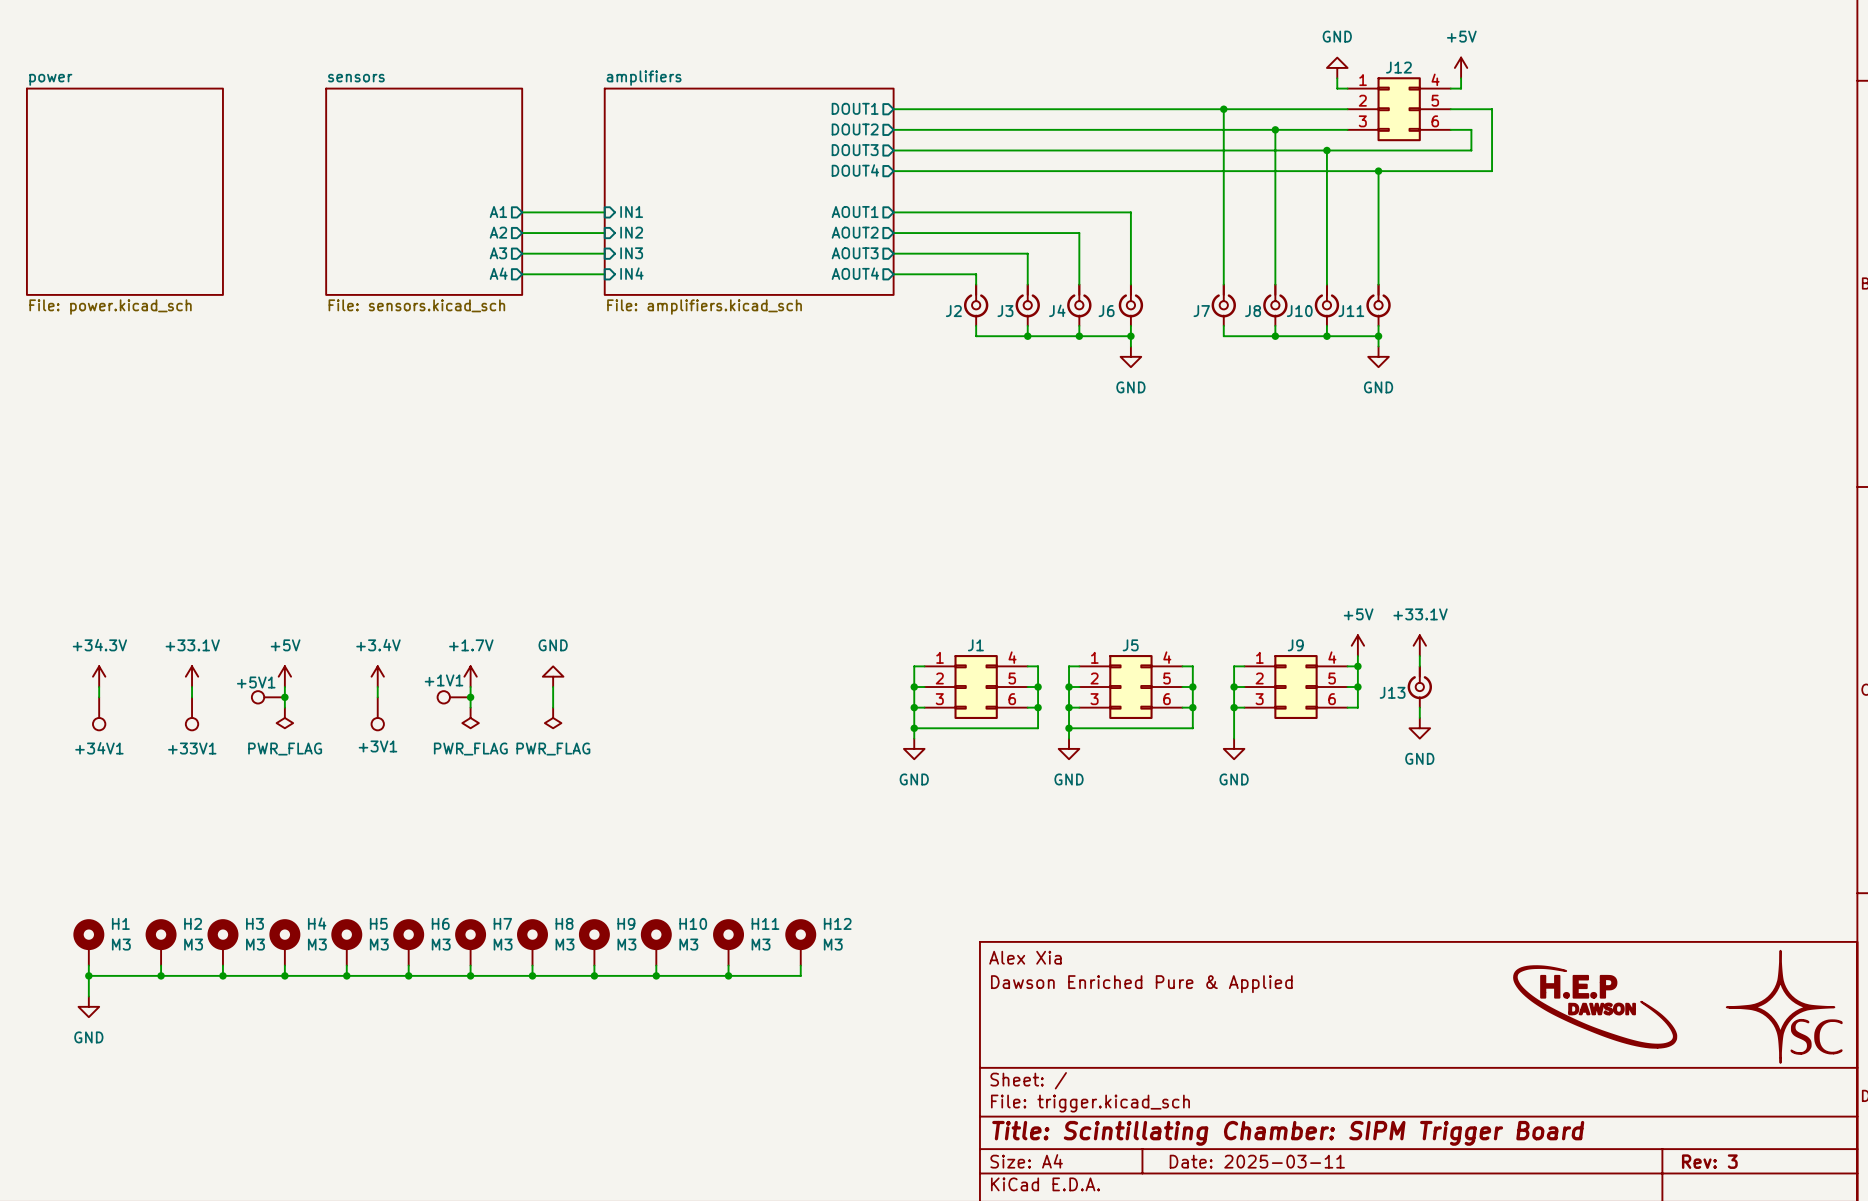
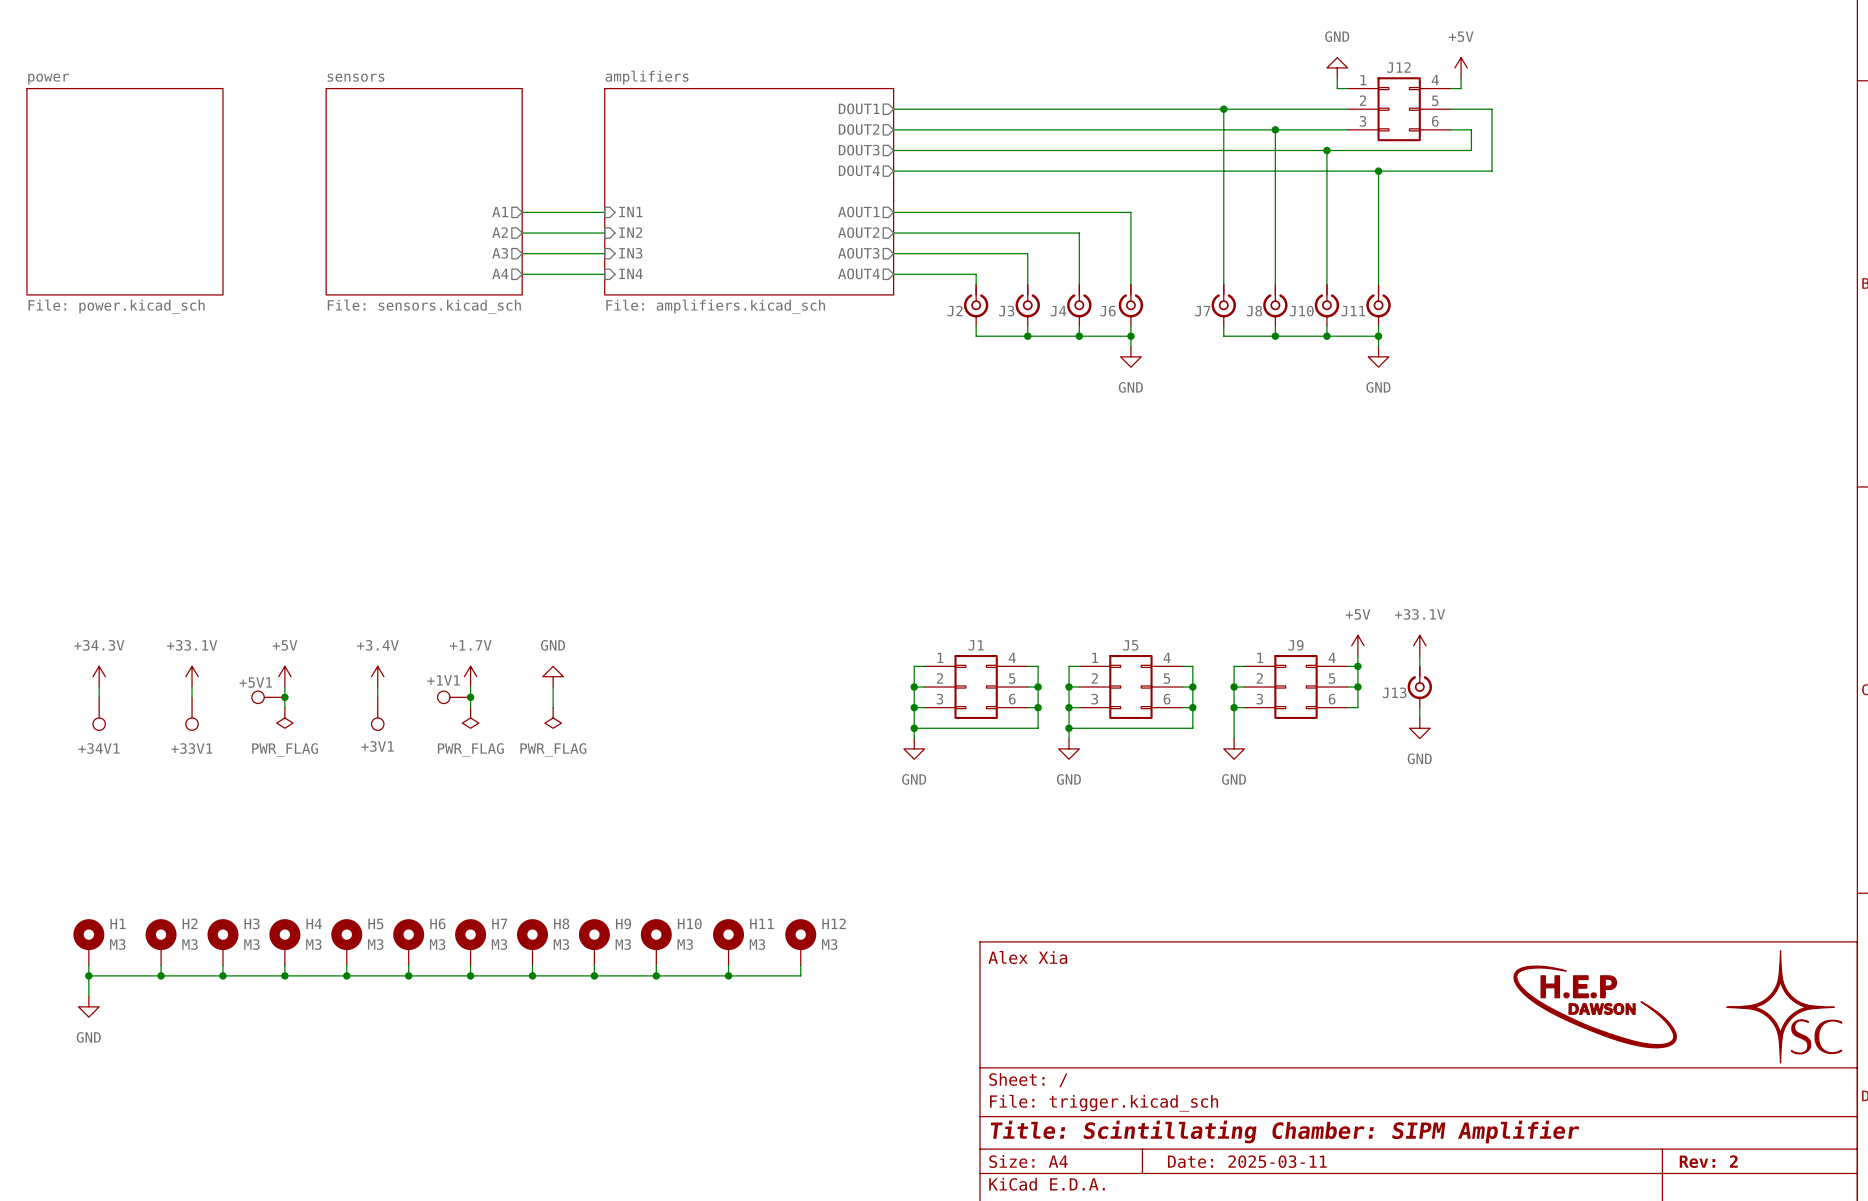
title block: Dawson Enriched Pure & Applied (1141, 984) -> none
title block: Title: Scintillating Chamber: SIPM Trigger Board (1288, 1133) -> Title: Scintillating Chamber: SIPM Amplifier (1284, 1132)
title block: Rev: 3 (1709, 1161) -> Rev: 2 (1708, 1161)

